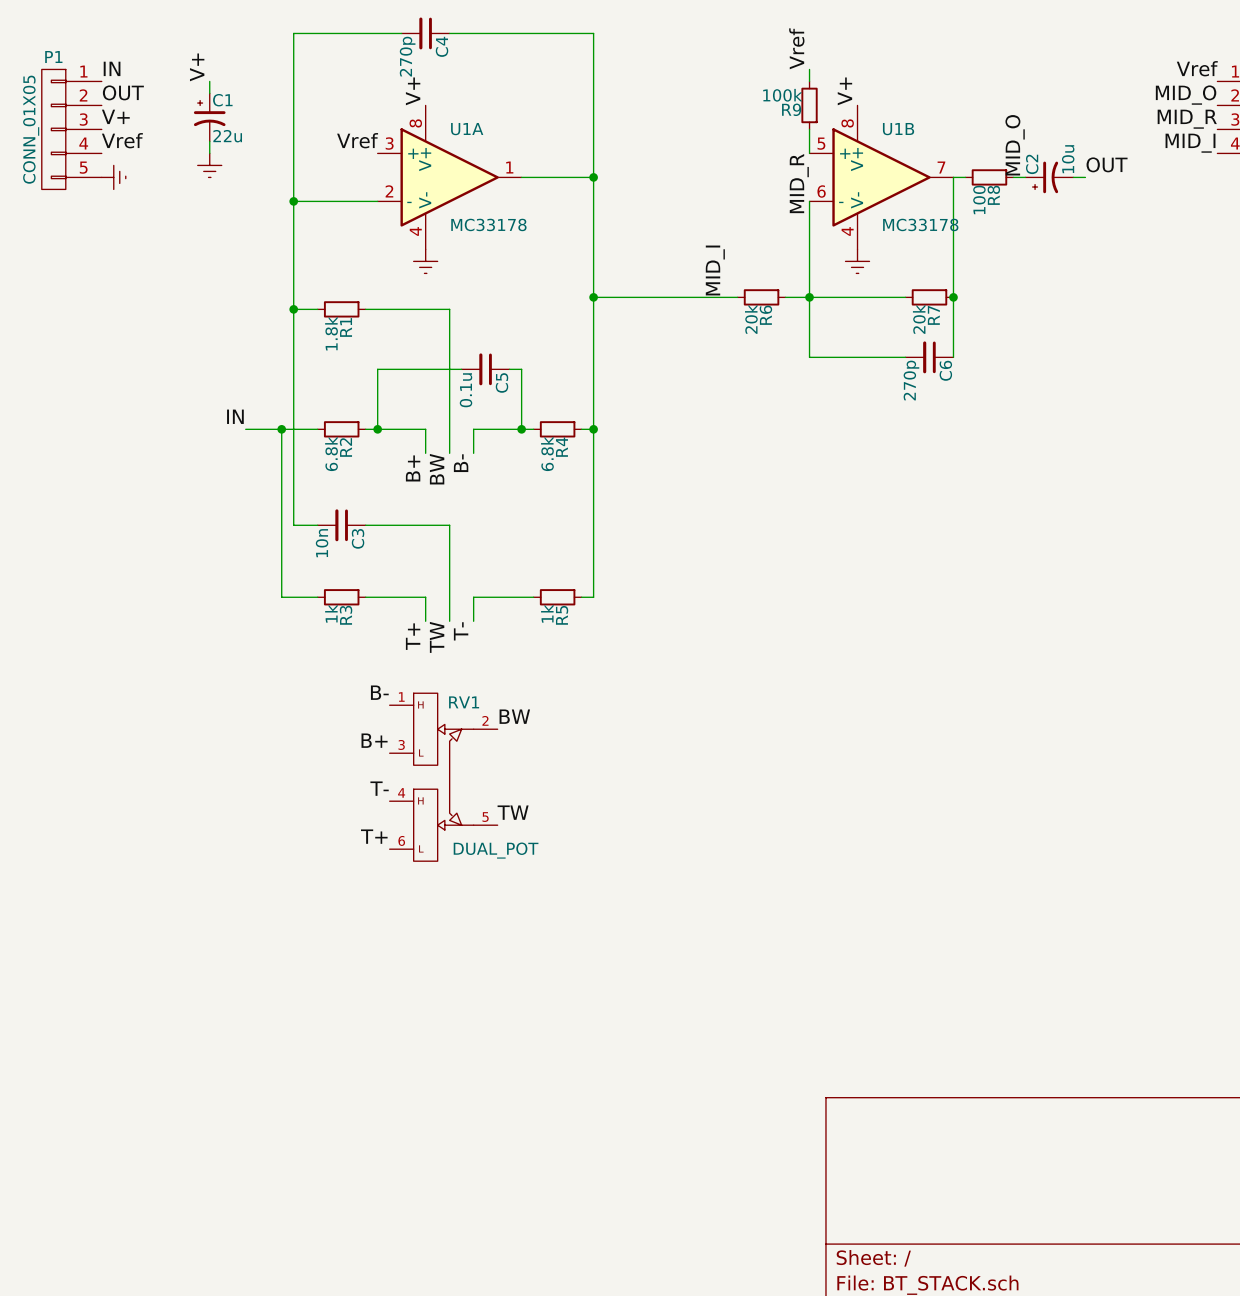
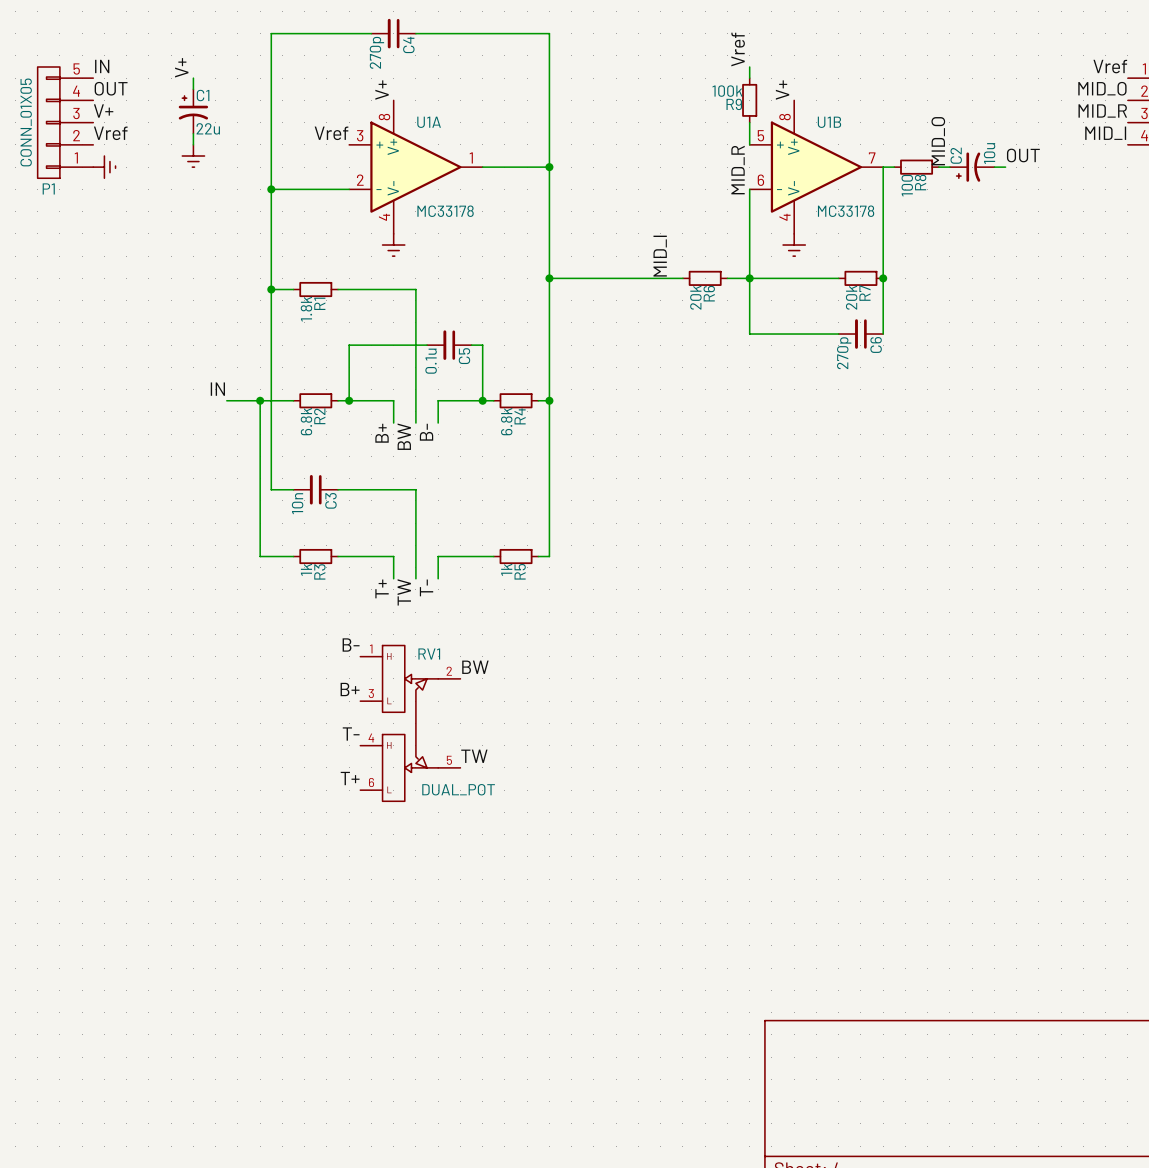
P1 flip: as is (53, 129) -> up-down (48, 122)

